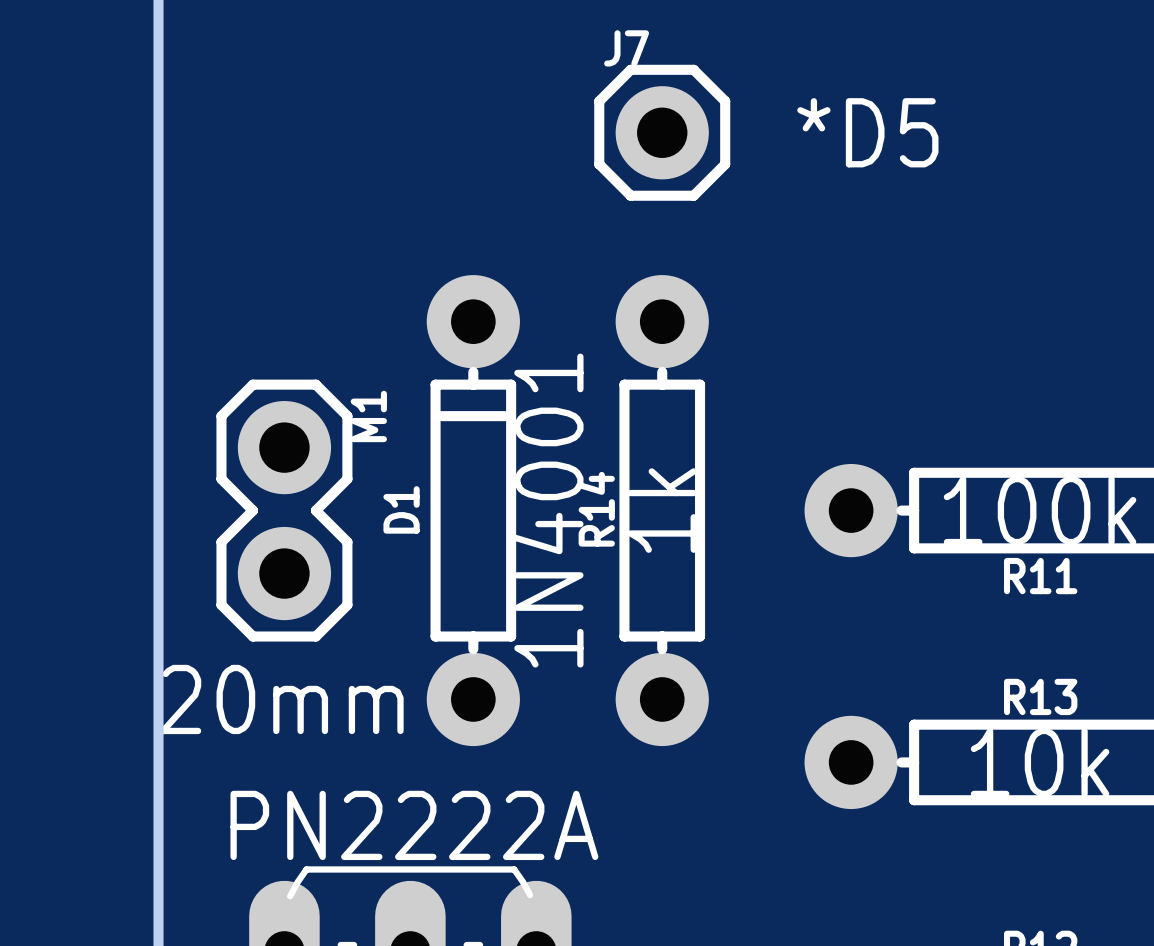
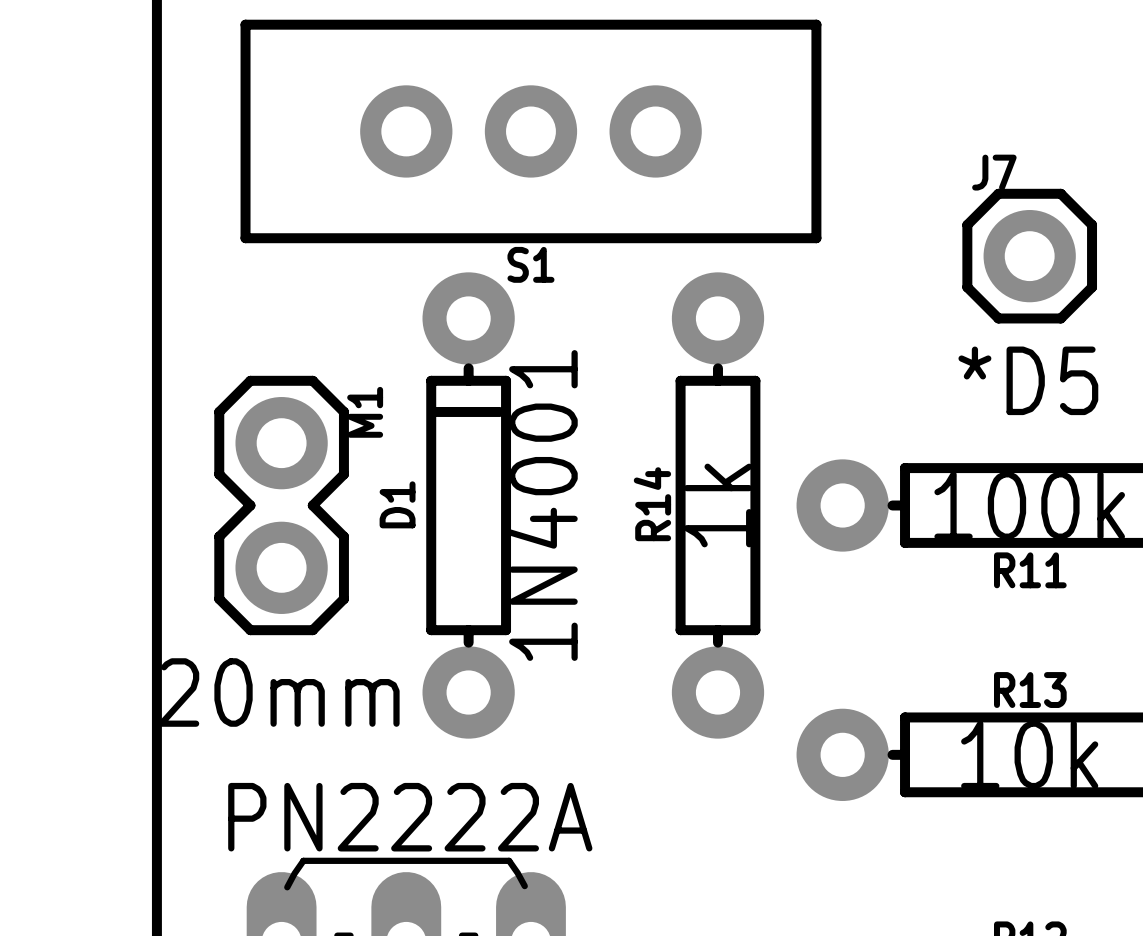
S1: none -> (530, 131)
J7 position: (662, 132) -> (1029, 256)
text position: *D5 (867, 132) -> *D5 (1028, 380)
text position: 1k (662, 510) -> 1k (717, 505)
R14 position: (662, 510) -> (717, 505)

